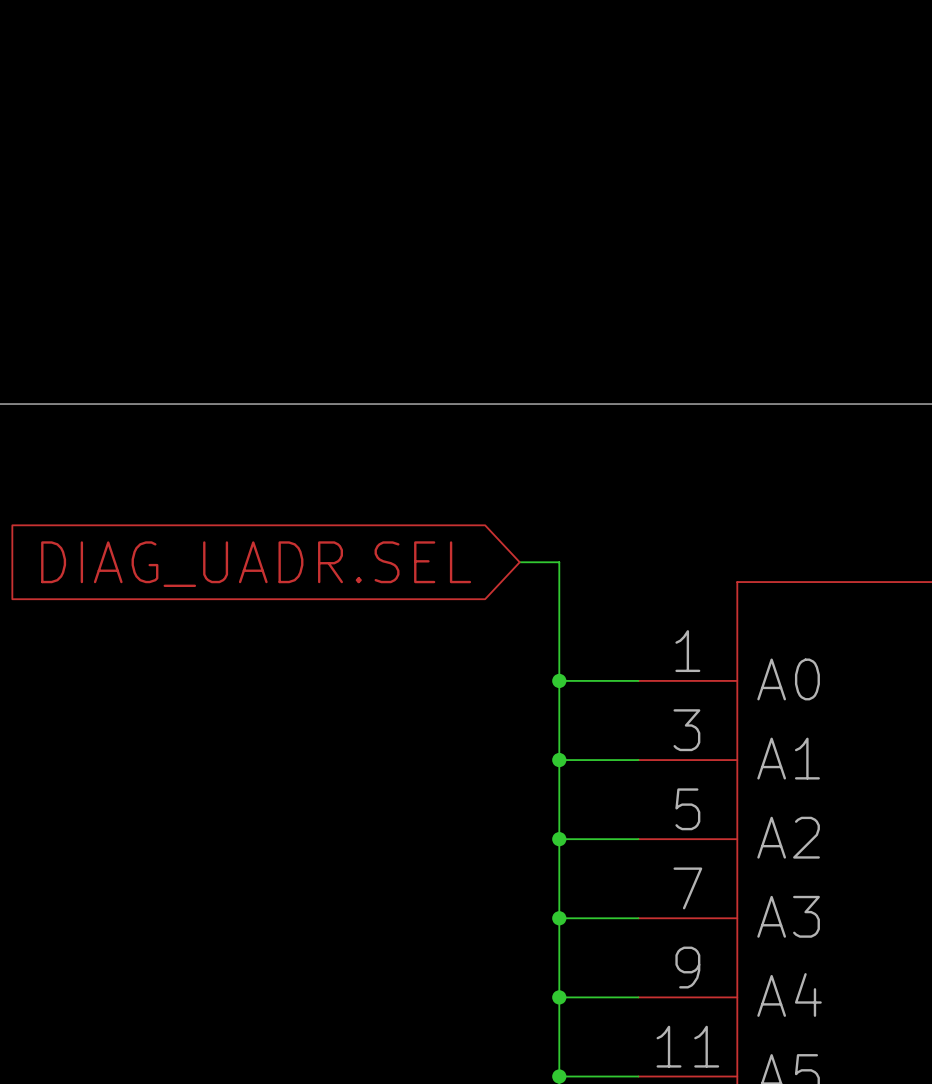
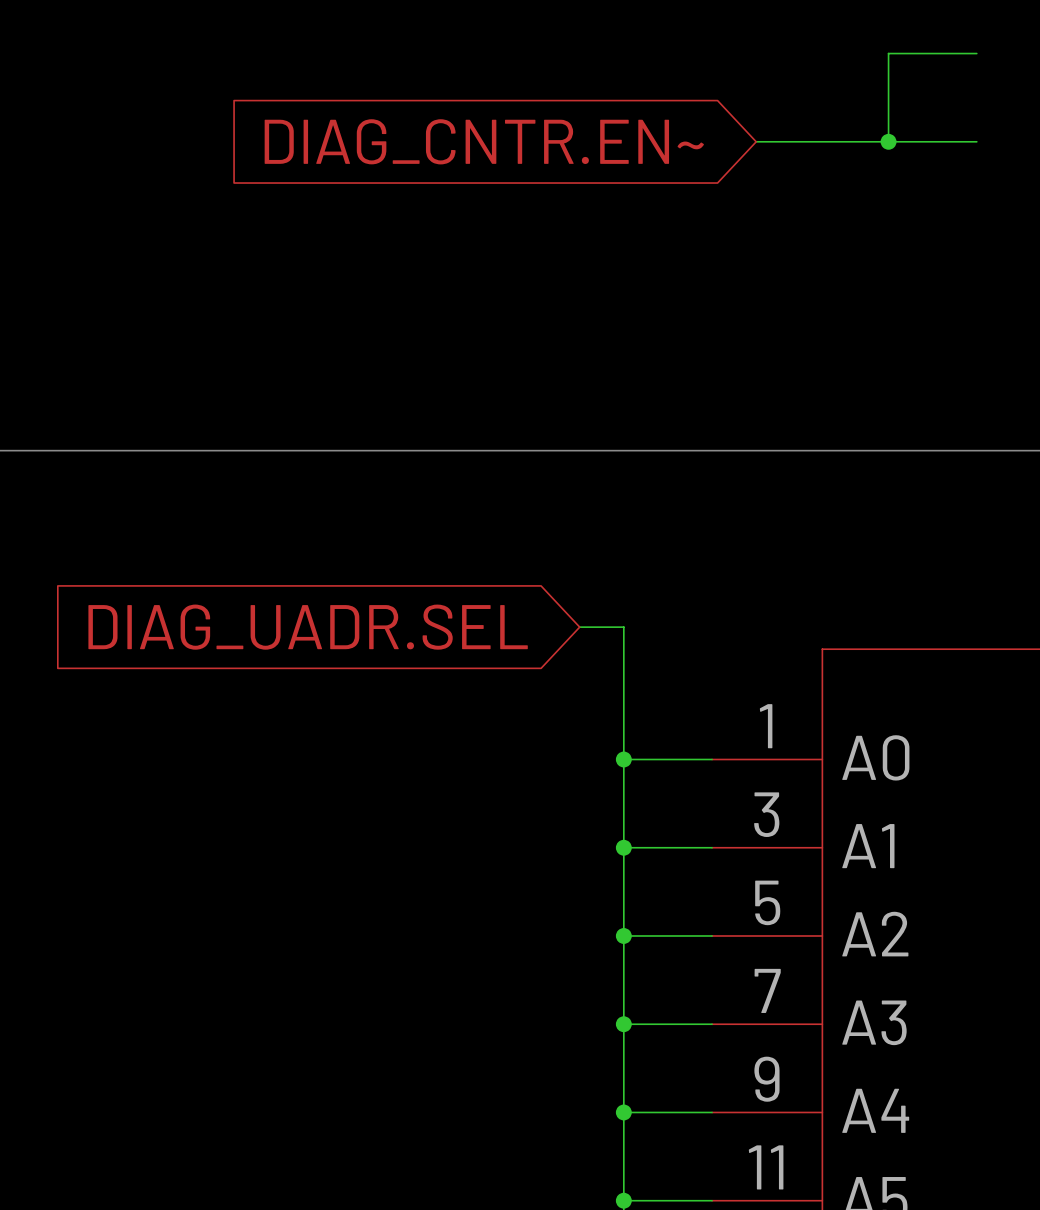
wire: none -> (976, 53) (888, 53) (888, 141)
wire: none -> (756, 141) (976, 141)
junction: none -> (888, 141)
global label: none -> DIAG_CNTR.EN~ (484, 141)

